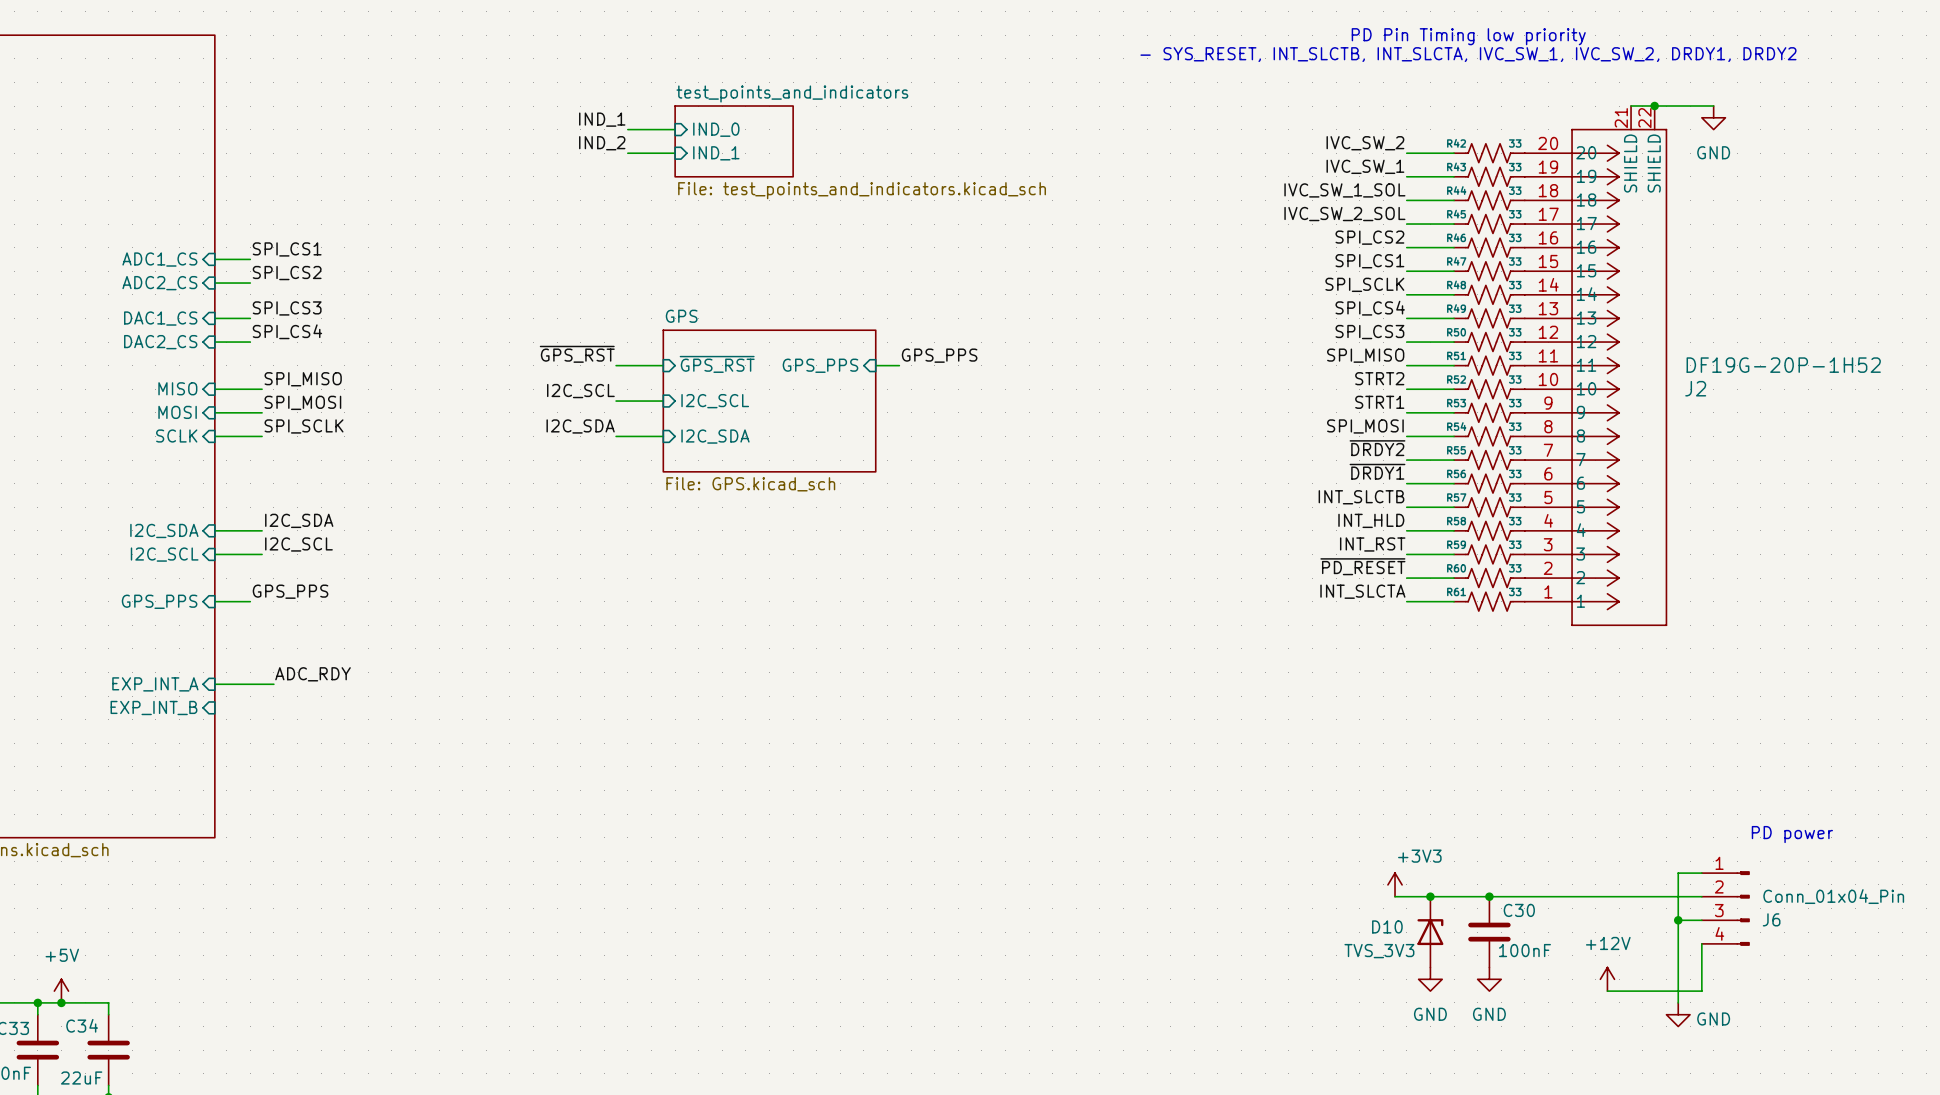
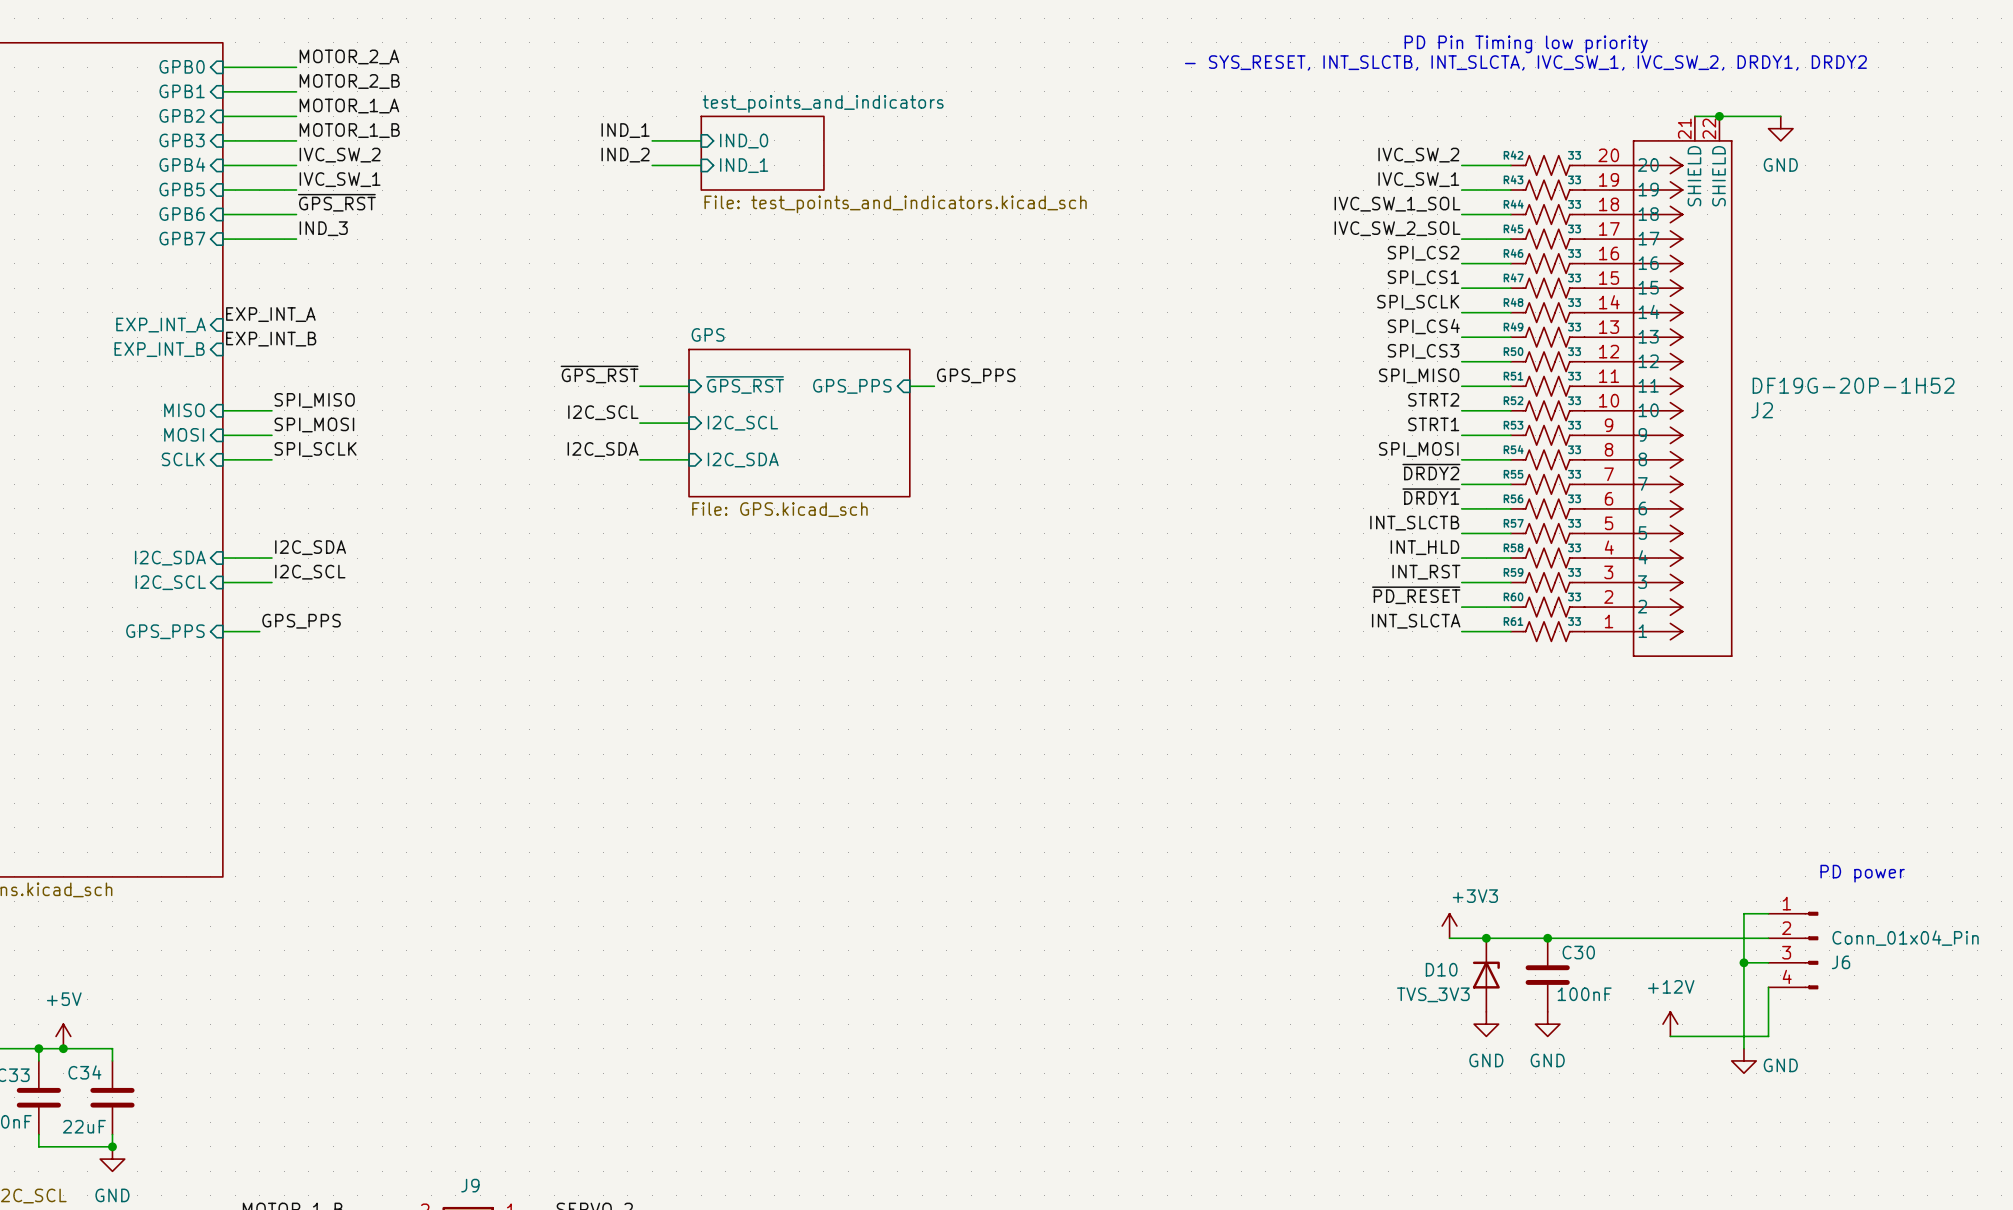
label: none -> MOTOR_2_A (349, 56)
sheet pin: none -> GPB0 (182, 66)
wire: none -> (222, 67) (296, 67)
label: none -> MOTOR_2_B (349, 81)
sheet pin: none -> GPB1 (182, 91)
wire: none -> (222, 91) (296, 91)
label: none -> MOTOR_1_A (349, 106)
sheet pin: none -> GPB2 (182, 115)
wire: none -> (222, 116) (296, 116)
label: none -> MOTOR_1_B (349, 130)
sheet pin: none -> GPB3 (182, 140)
wire: none -> (222, 140) (296, 140)
label: none -> IVC_SW_2 (340, 155)
sheet pin: none -> GPB4 (182, 164)
wire: none -> (222, 165) (296, 165)
label: none -> IVC_SW_1 (340, 179)
sheet pin: none -> GPB5 (182, 189)
wire: none -> (222, 190) (296, 190)
label: none -> ~{GPS_RST} (336, 202)
sheet pin: none -> GPB6 (182, 214)
wire: none -> (222, 214) (296, 214)
label: none -> IND_3 (323, 228)
sheet pin: none -> GPB7 (182, 238)
wire: none -> (222, 239) (296, 239)
label: SPI_CS1 (287, 249) -> none
sheet pin: ADC1_CS (159, 259) -> none
wire: (214, 259) (250, 259) -> none
label: SPI_CS2 (287, 273) -> none
sheet pin: ADC2_CS (159, 283) -> none
wire: (214, 283) (250, 283) -> none
label: none -> EXP_INT_A (270, 314)
sheet pin: none -> EXP_INT_A (161, 325)
label: SPI_CS3 (287, 308) -> none
sheet pin: DAC1_CS (160, 318) -> none
wire: (214, 318) (250, 318) -> none
label: none -> EXP_INT_B (271, 339)
sheet pin: none -> EXP_INT_B (159, 349)
label: SPI_CS4 (287, 331) -> none
sheet pin: DAC2_CS (160, 342) -> none
wire: (214, 342) (250, 342) -> none
label: ADC_RDY (313, 674) -> none
sheet pin: EXP_INT_A (155, 684) -> none
wire: (214, 684) (273, 684) -> none
sheet pin: EXP_INT_B (153, 707) -> none

